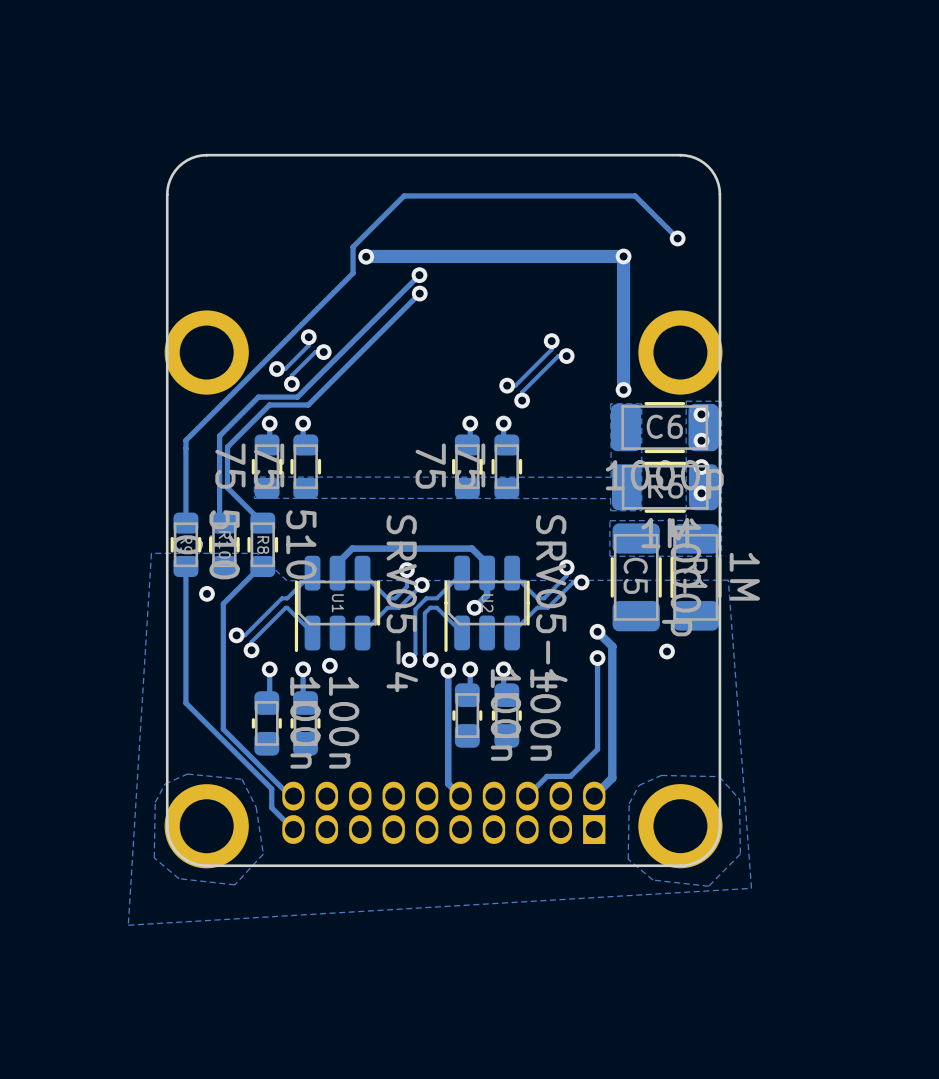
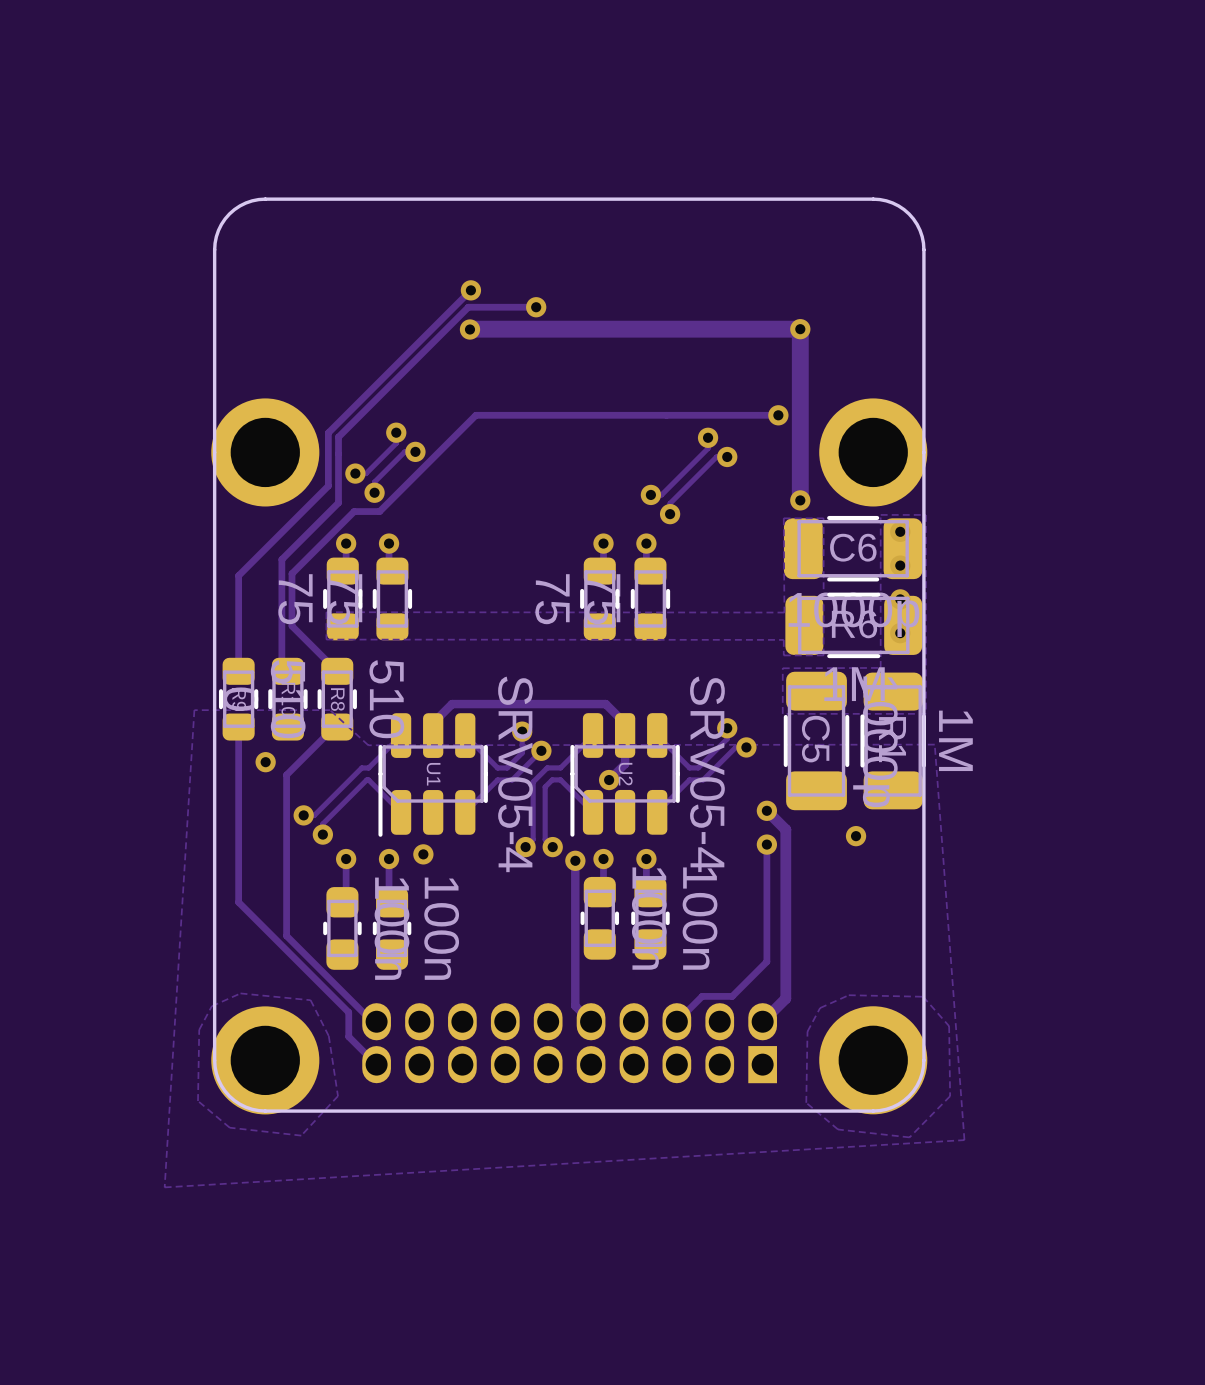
via: none -> (470, 290)
track: (677, 238) (635, 195) (404, 195) (353, 247) (353, 273) (185, 440) (185, 448) -> (470, 290) (328, 432) (328, 486) (238, 575)
via: (677, 238) -> none
via: none -> (536, 307)
track: (419, 275) (297, 397) (258, 397) -> (536, 307) (468, 307) (338, 437) (338, 502) (331, 509)
via: (419, 275) -> none
track: (419, 293) (308, 405) (269, 405) -> (778, 415) (475, 415) (379, 511) (354, 511) (345, 519)
via: (419, 293) -> none
via: none -> (778, 415)

